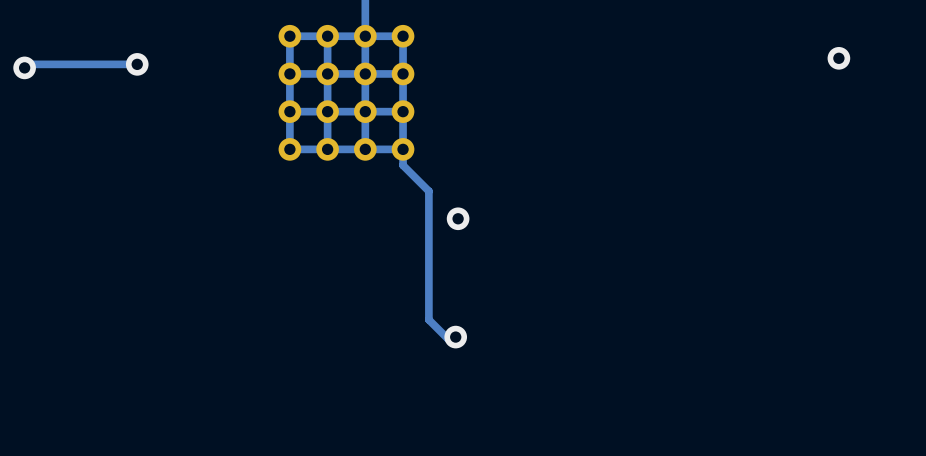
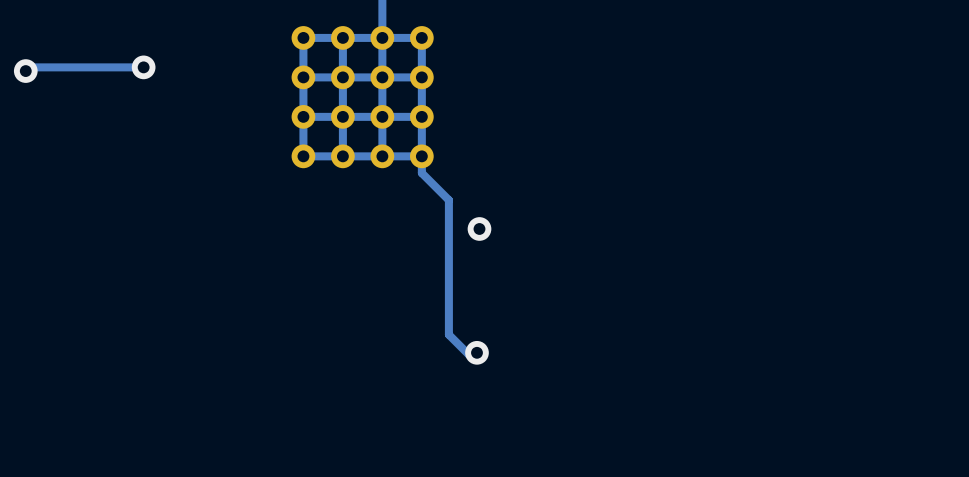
via: (838, 58) -> none

